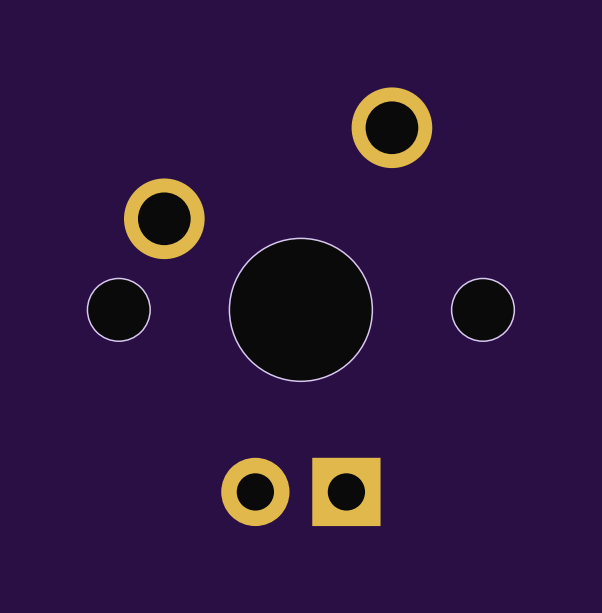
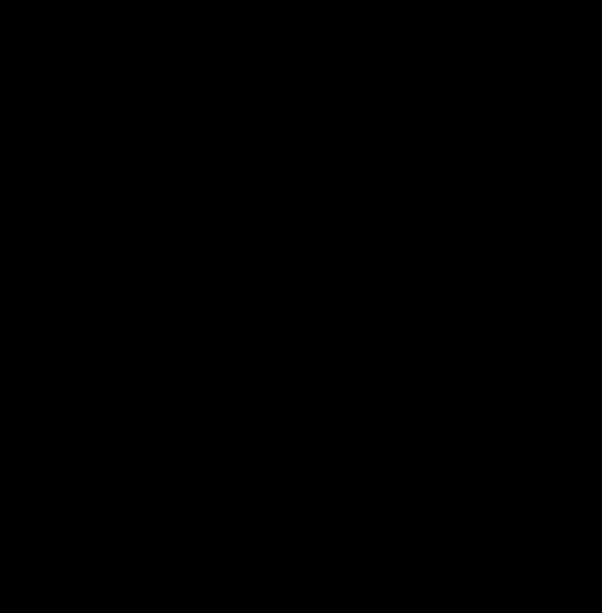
part: (300, 306) -> none

